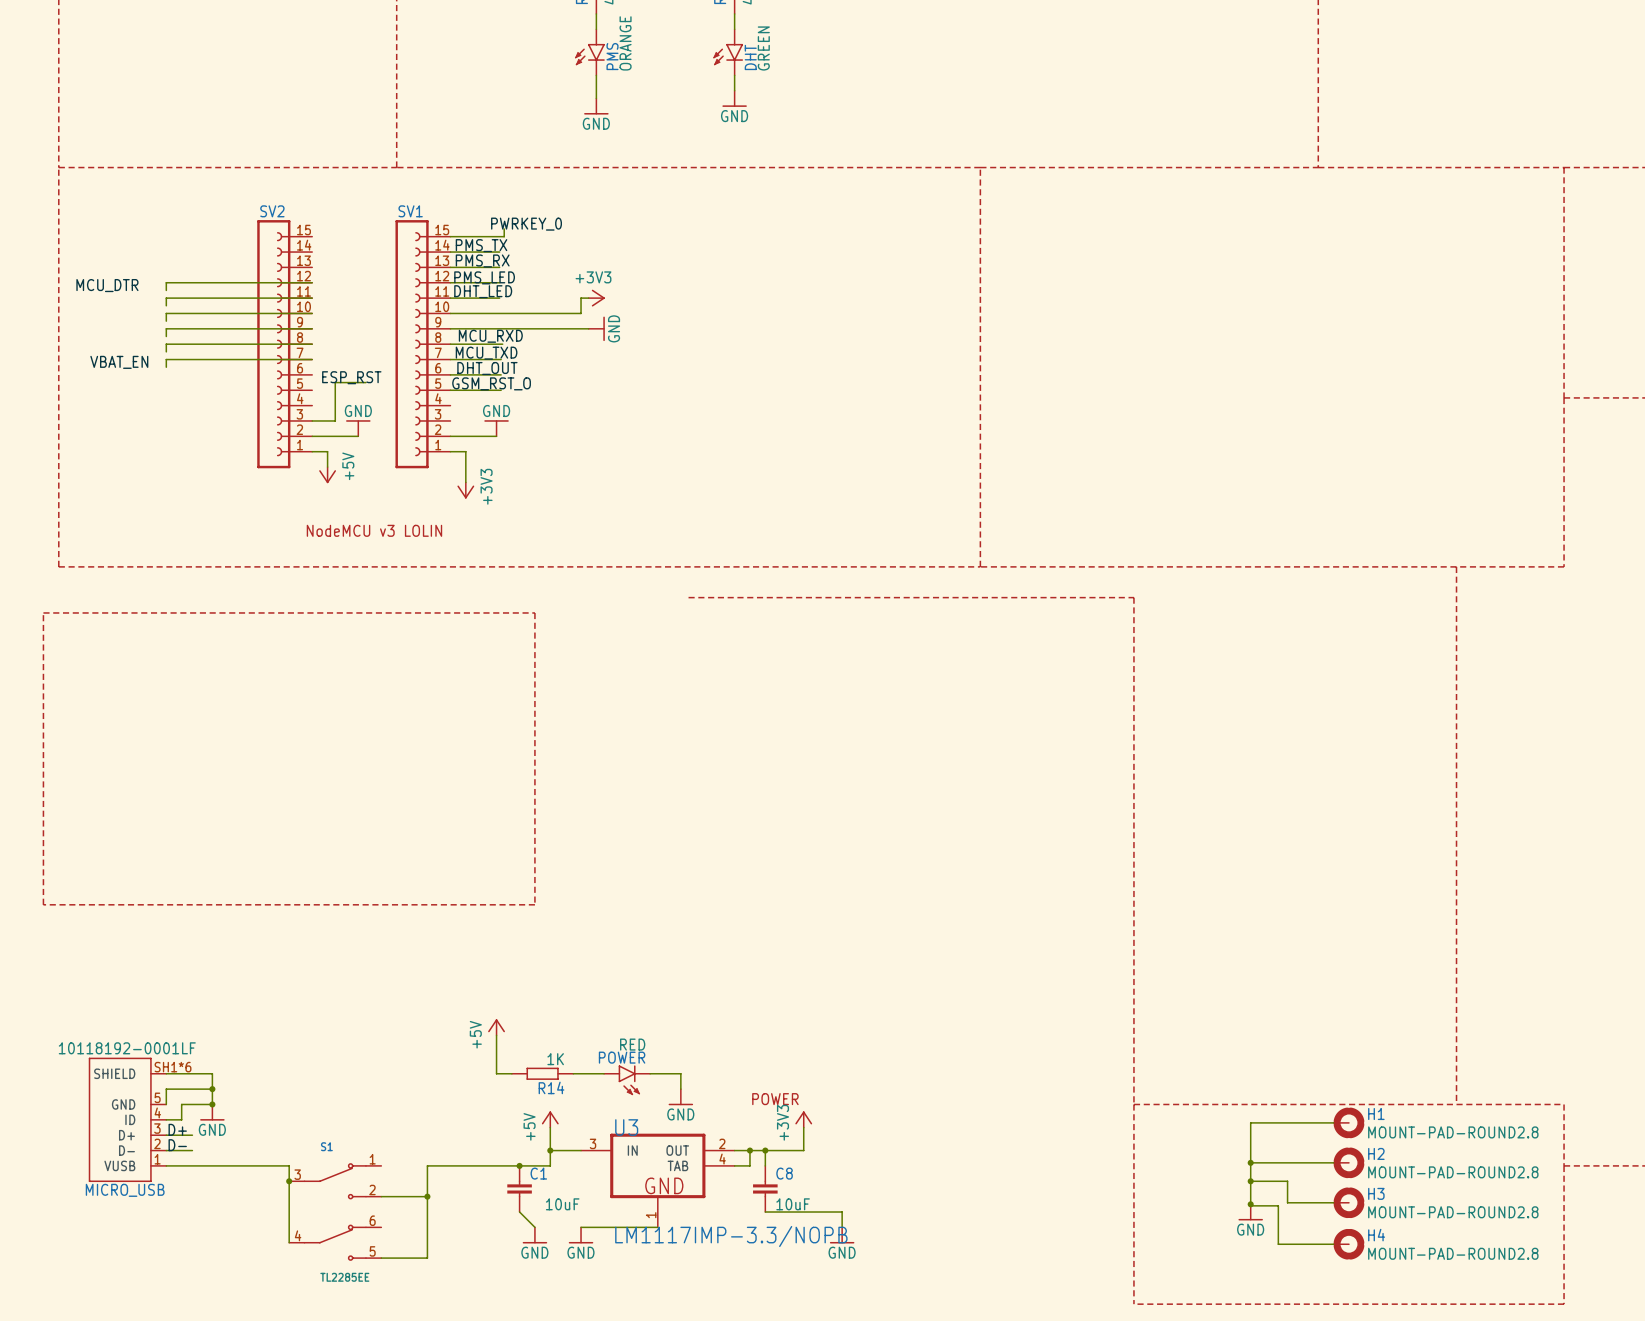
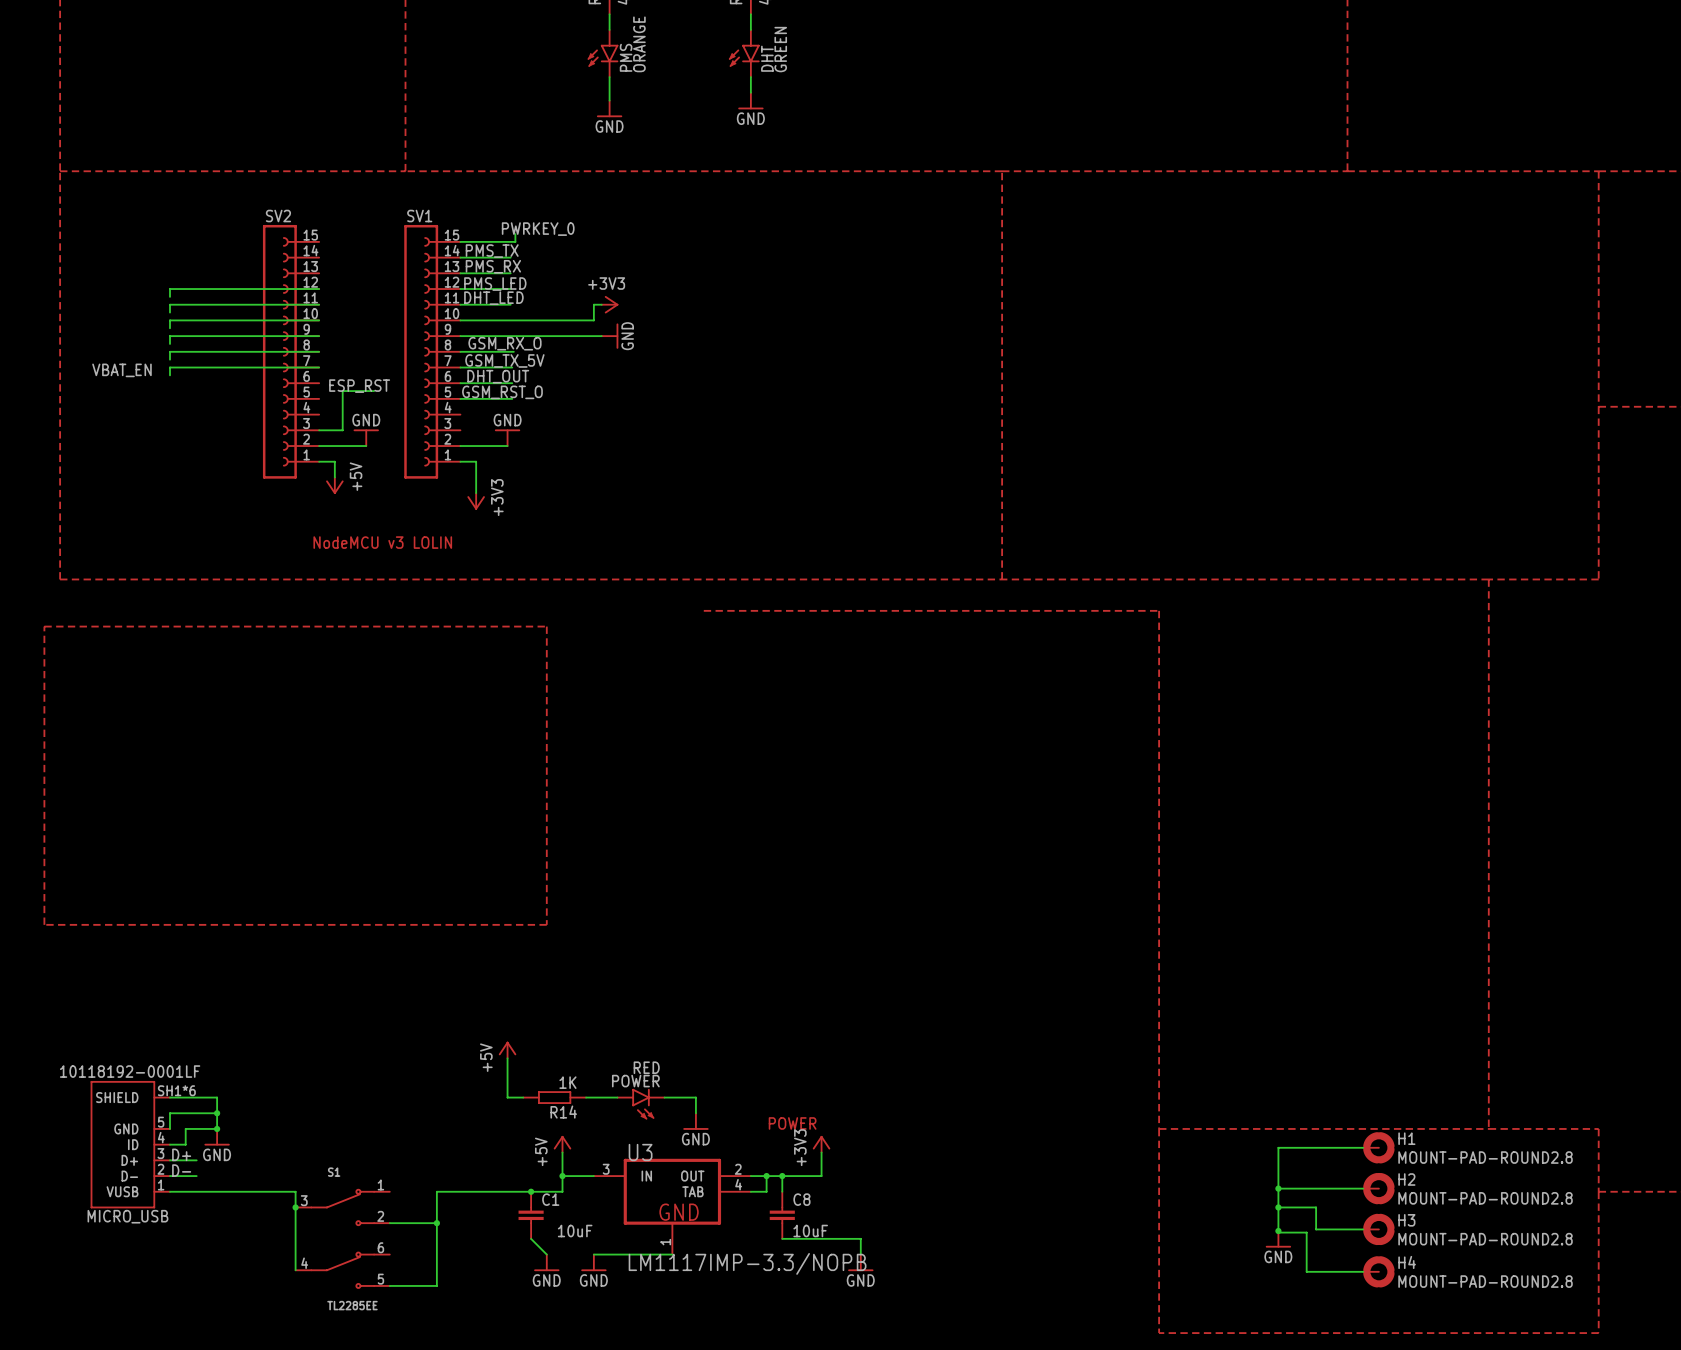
label: MCU_DTR (107, 285) -> none
label: MCU_RXD (490, 336) -> GSM_RX_O (504, 343)
label: MCU_TXD (486, 353) -> GSM_TX_5V (504, 360)

